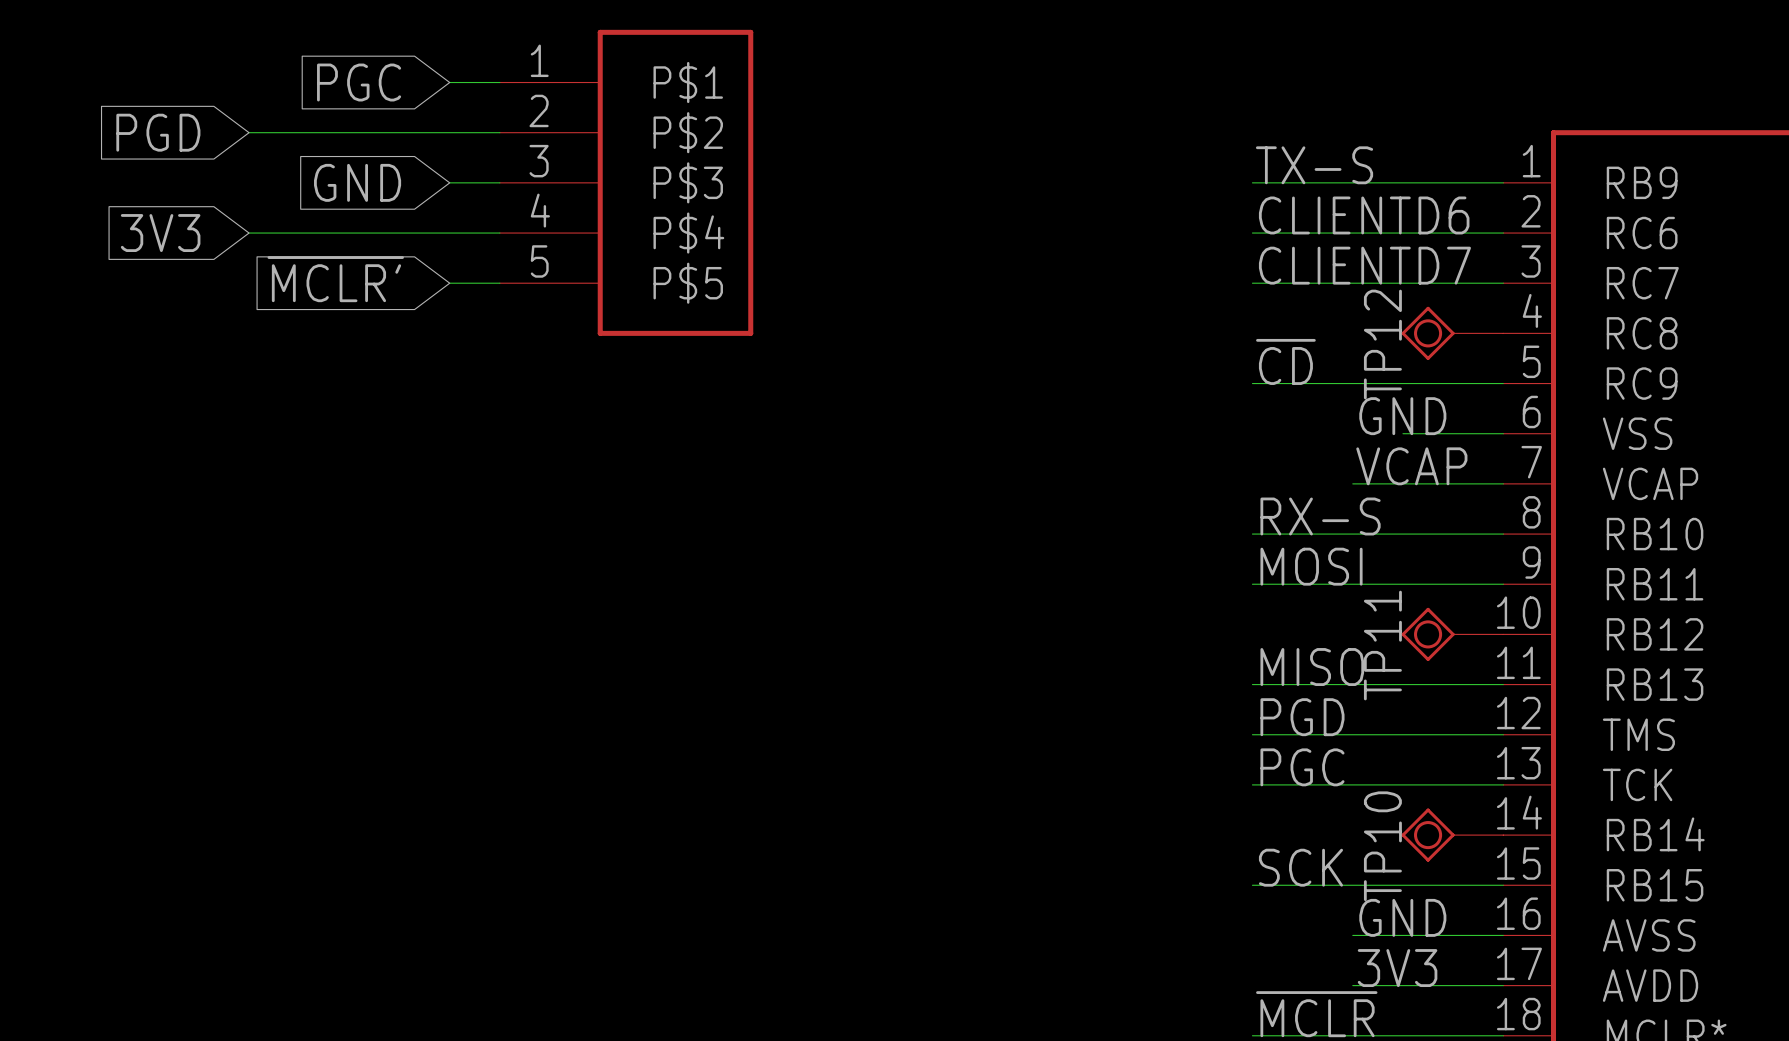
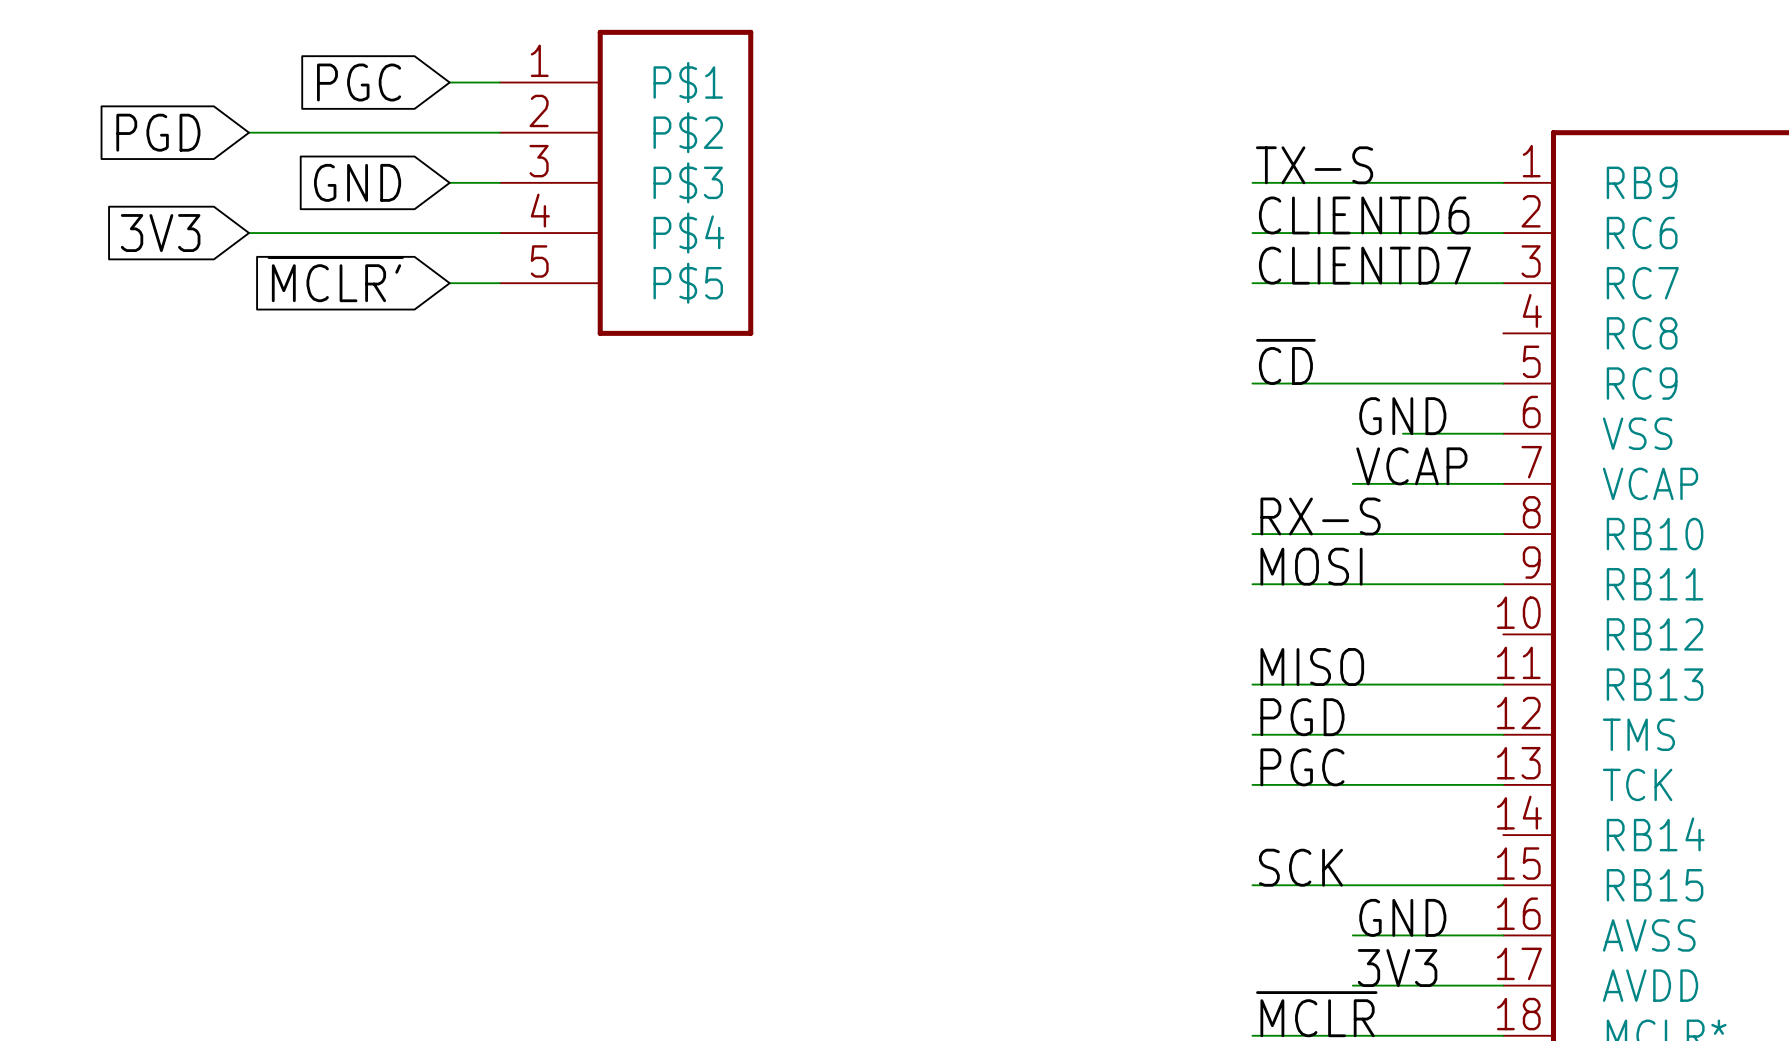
TP12: (1452, 333) -> none
TP11: (1452, 634) -> none
TP10: (1452, 835) -> none

